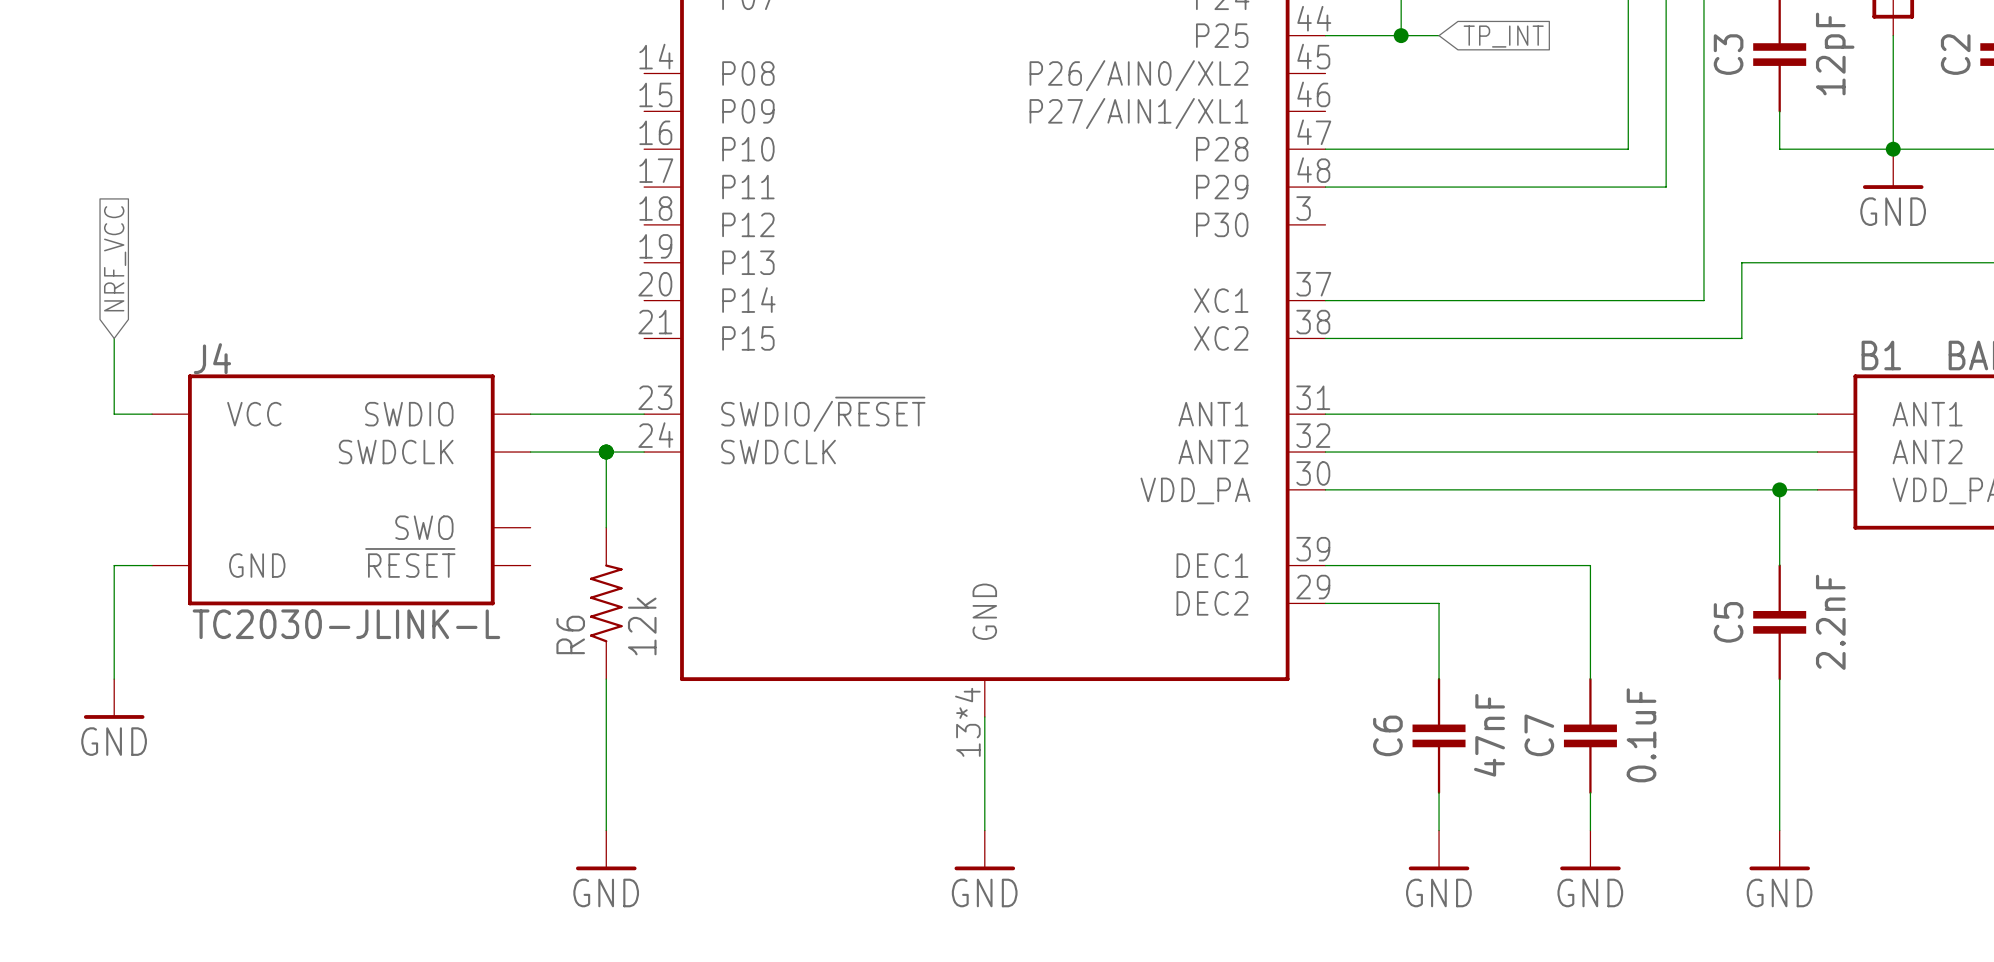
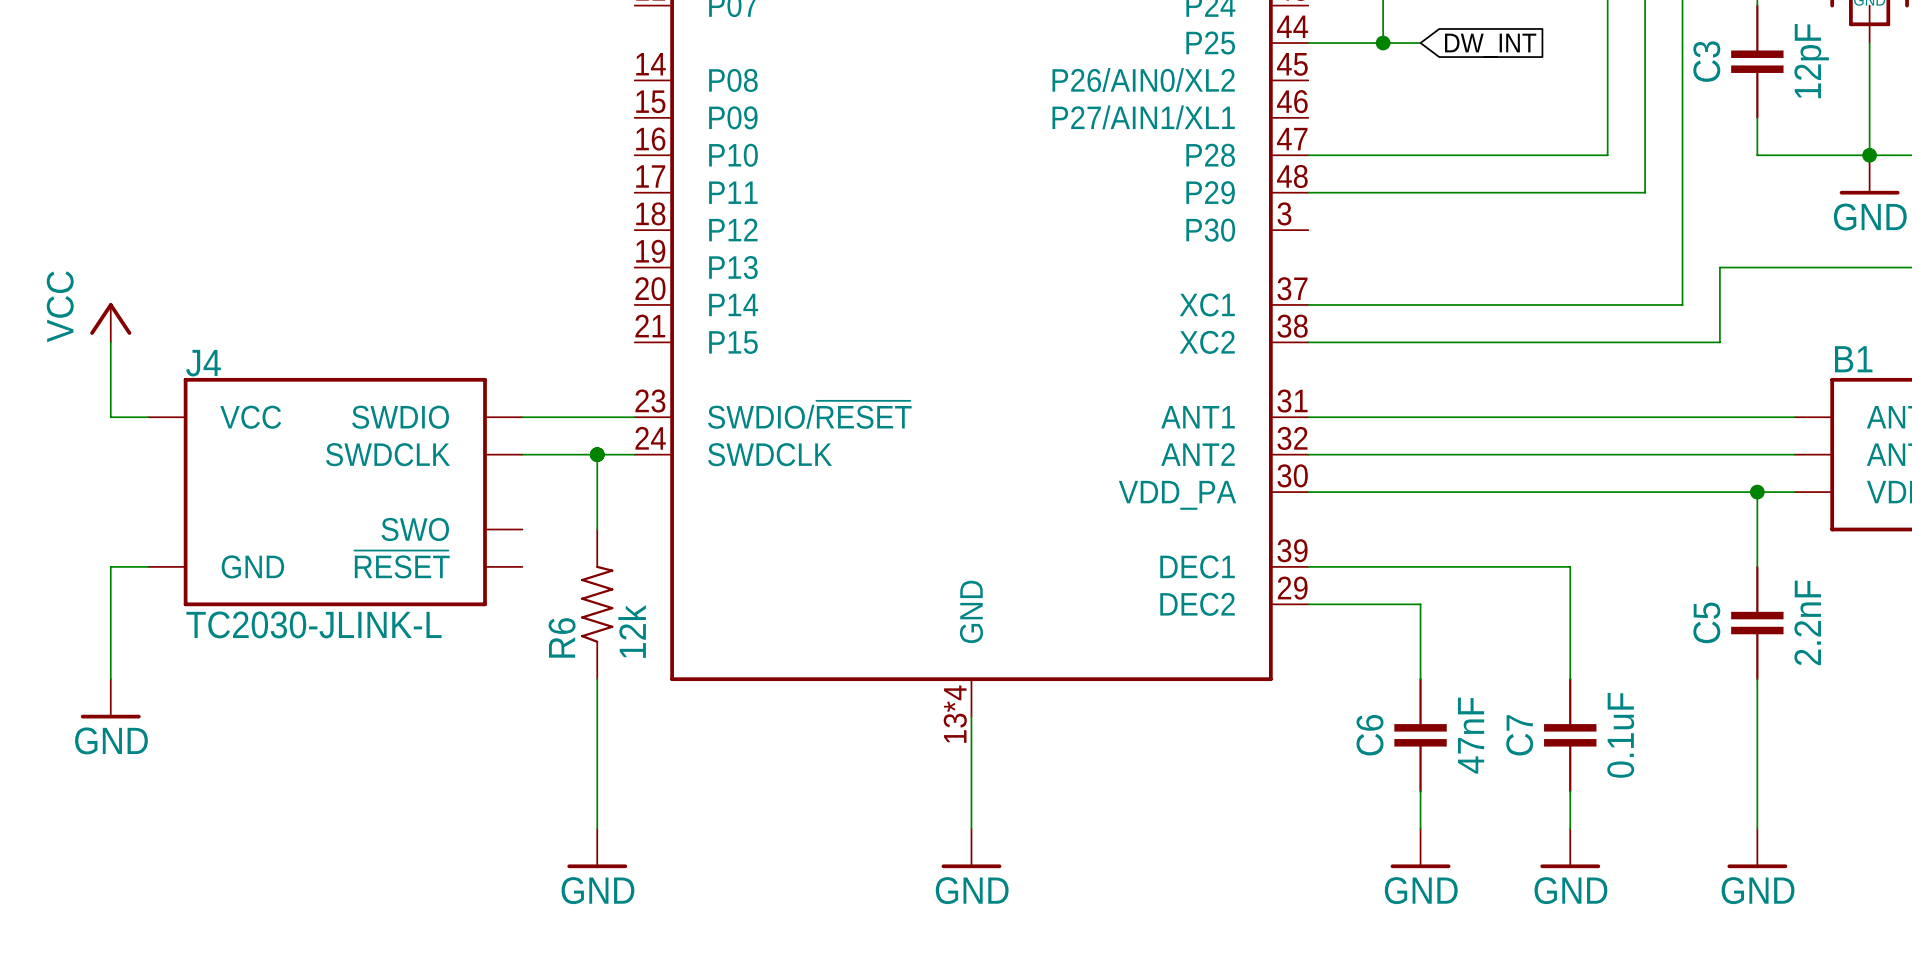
global label: TP_INT (1503, 36) -> DW_INT (1490, 45)
global label: NRF_VCC (115, 258) -> none
power symbol: none -> VCC (110, 322)

